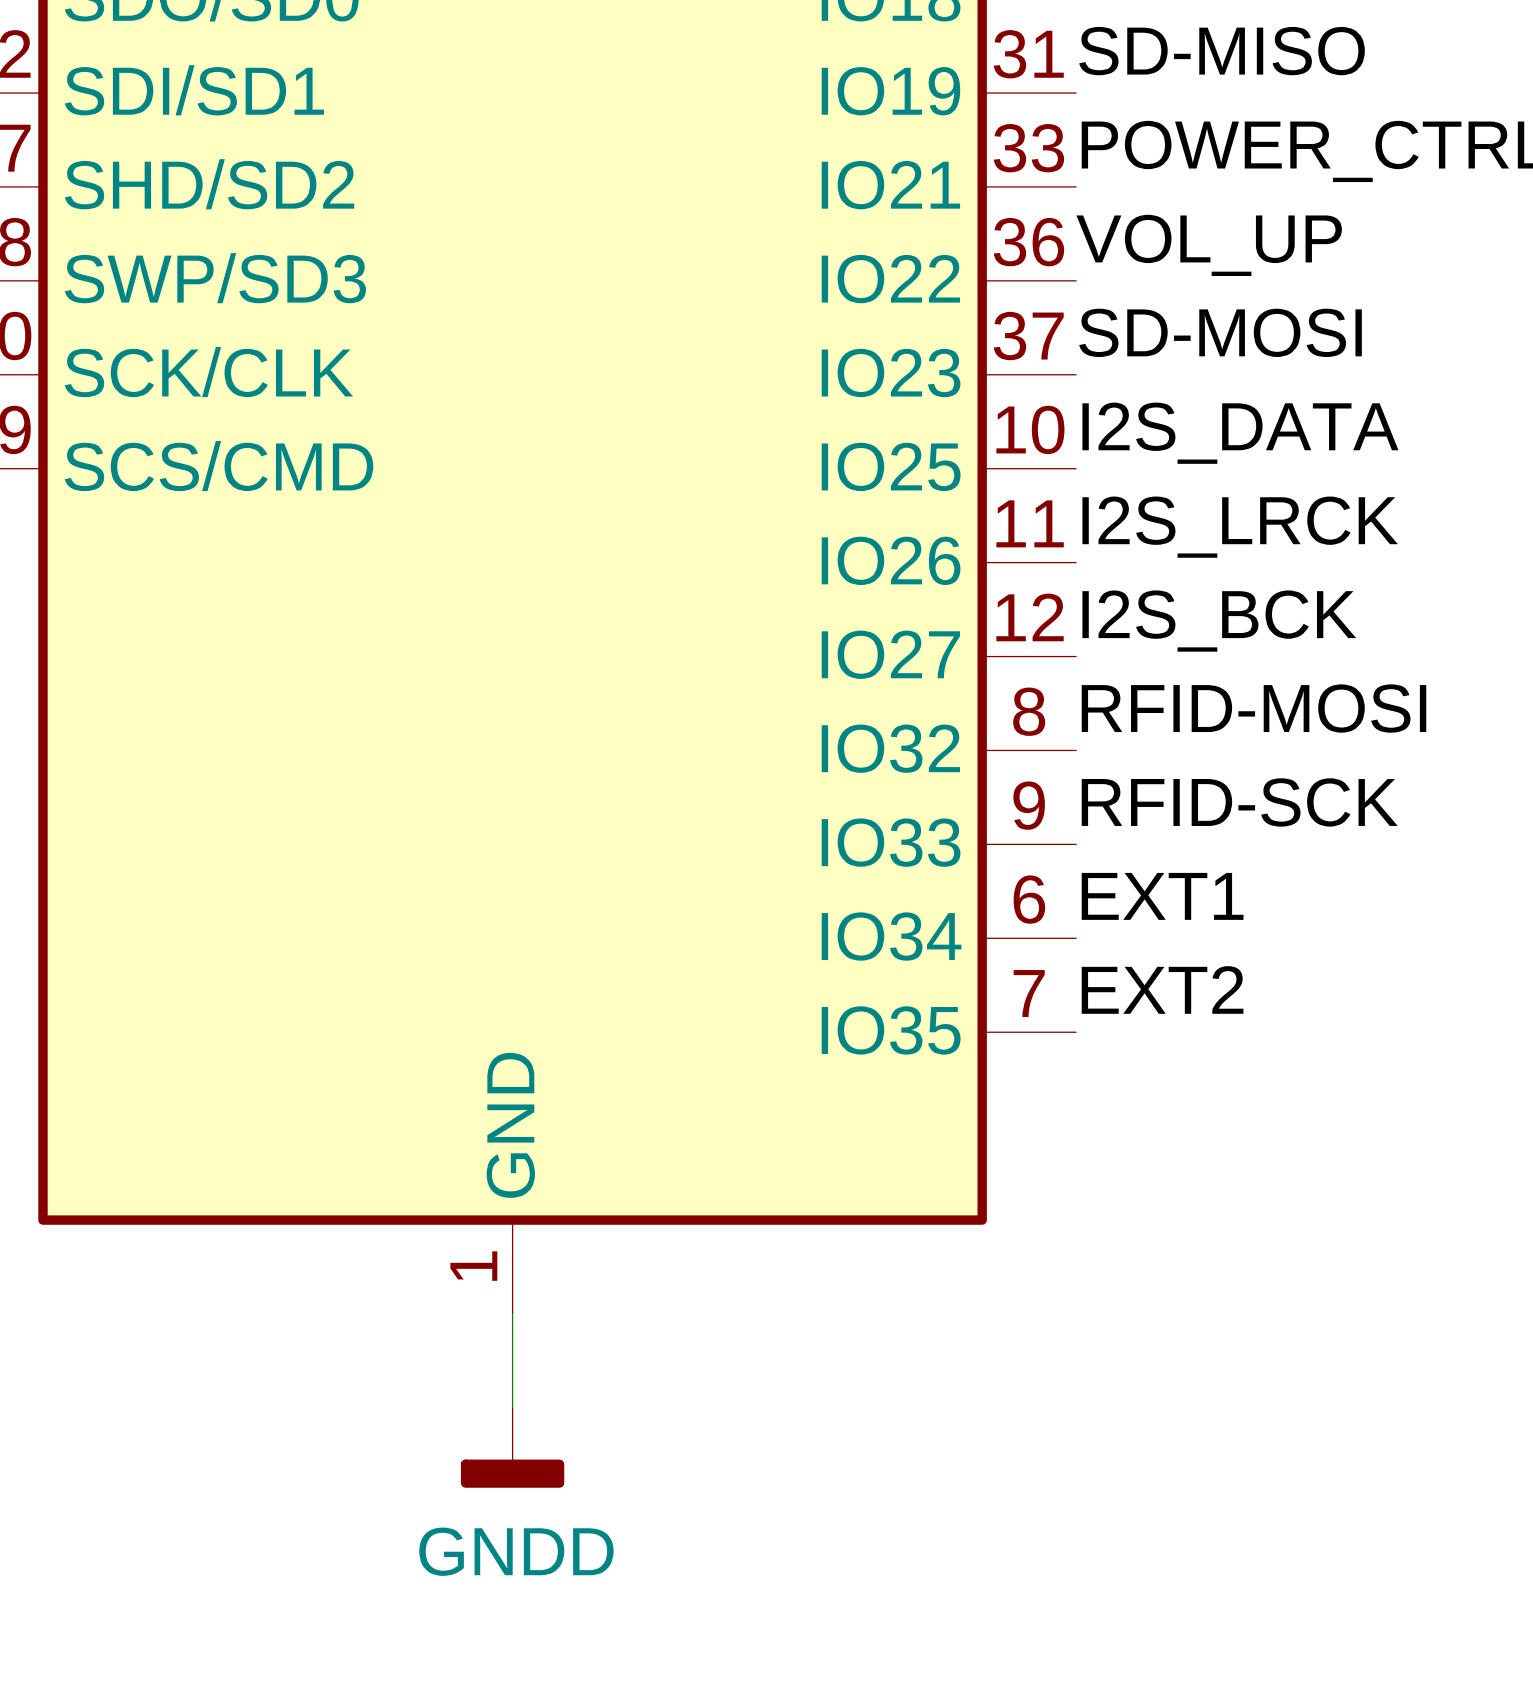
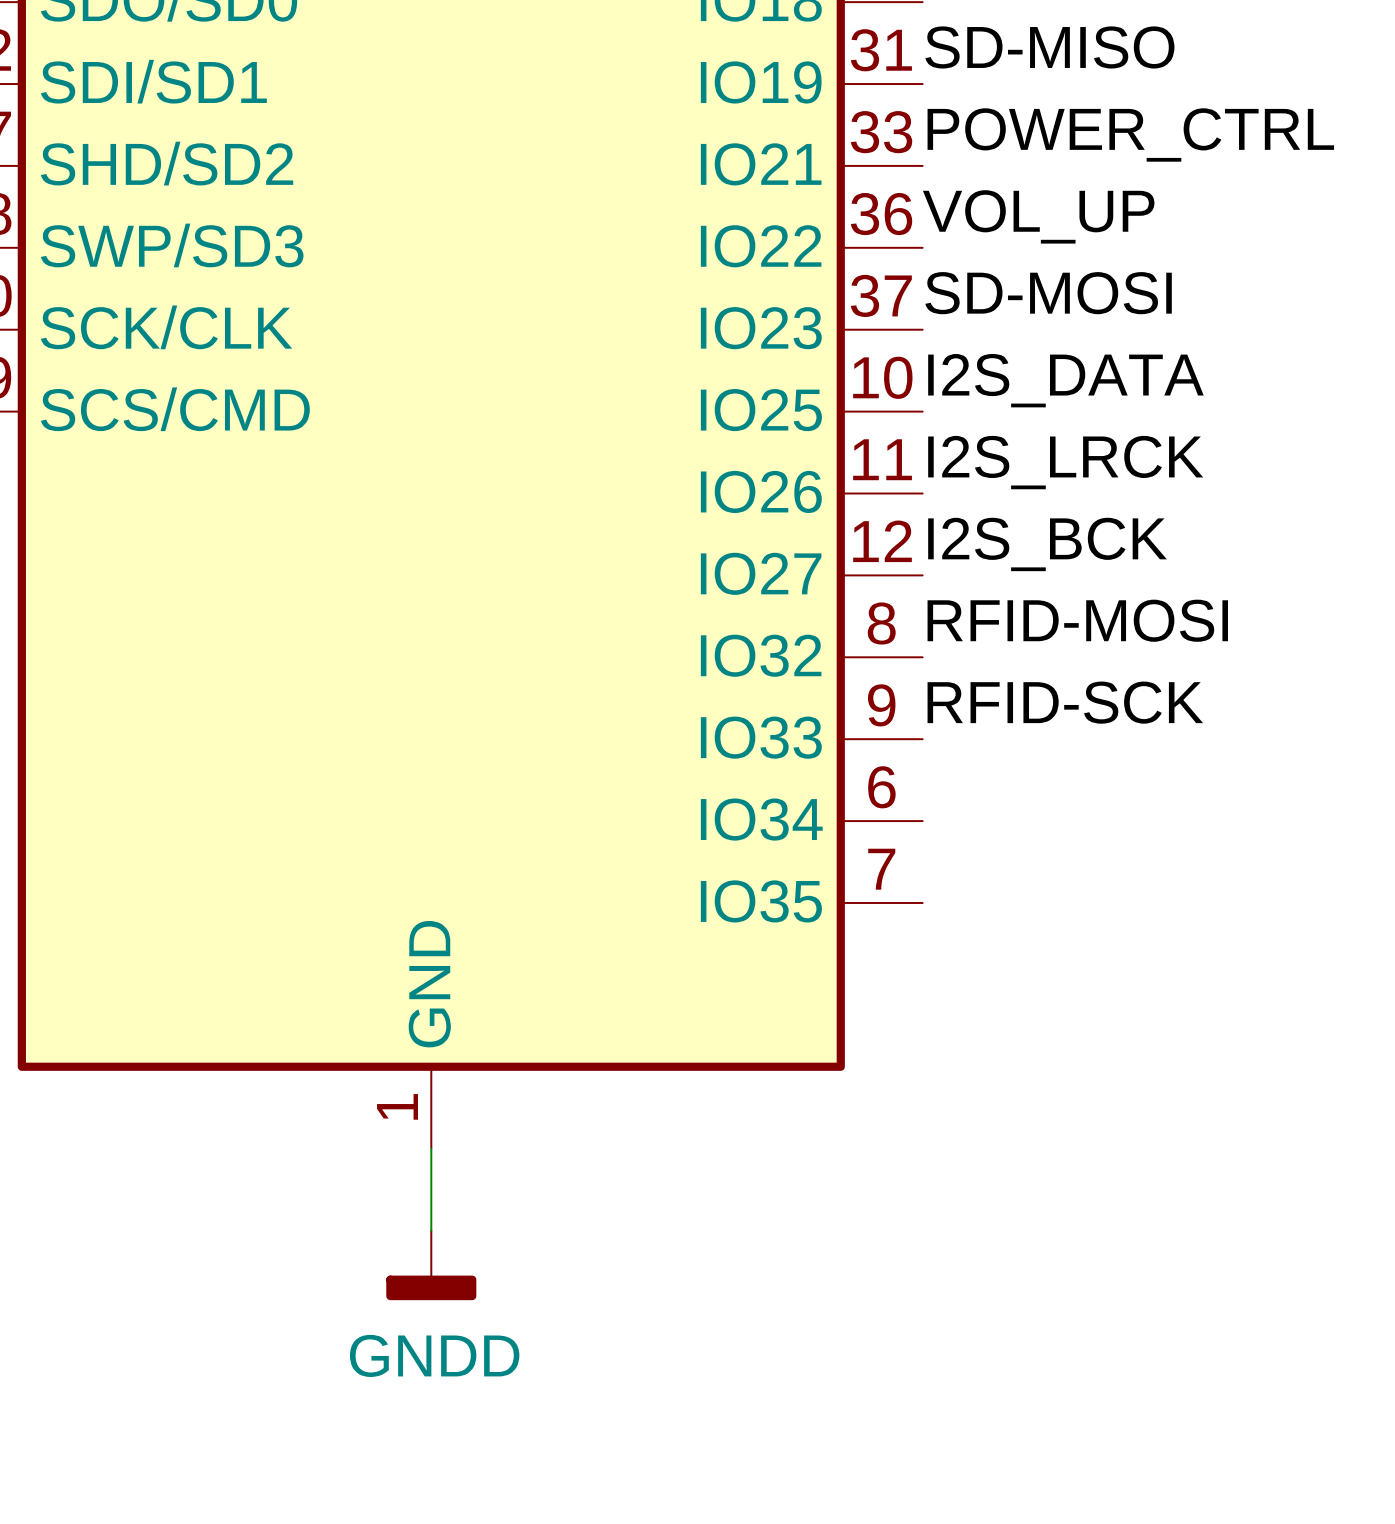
label: EXT1 (1162, 896) -> none
label: EXT2 (1162, 989) -> none

